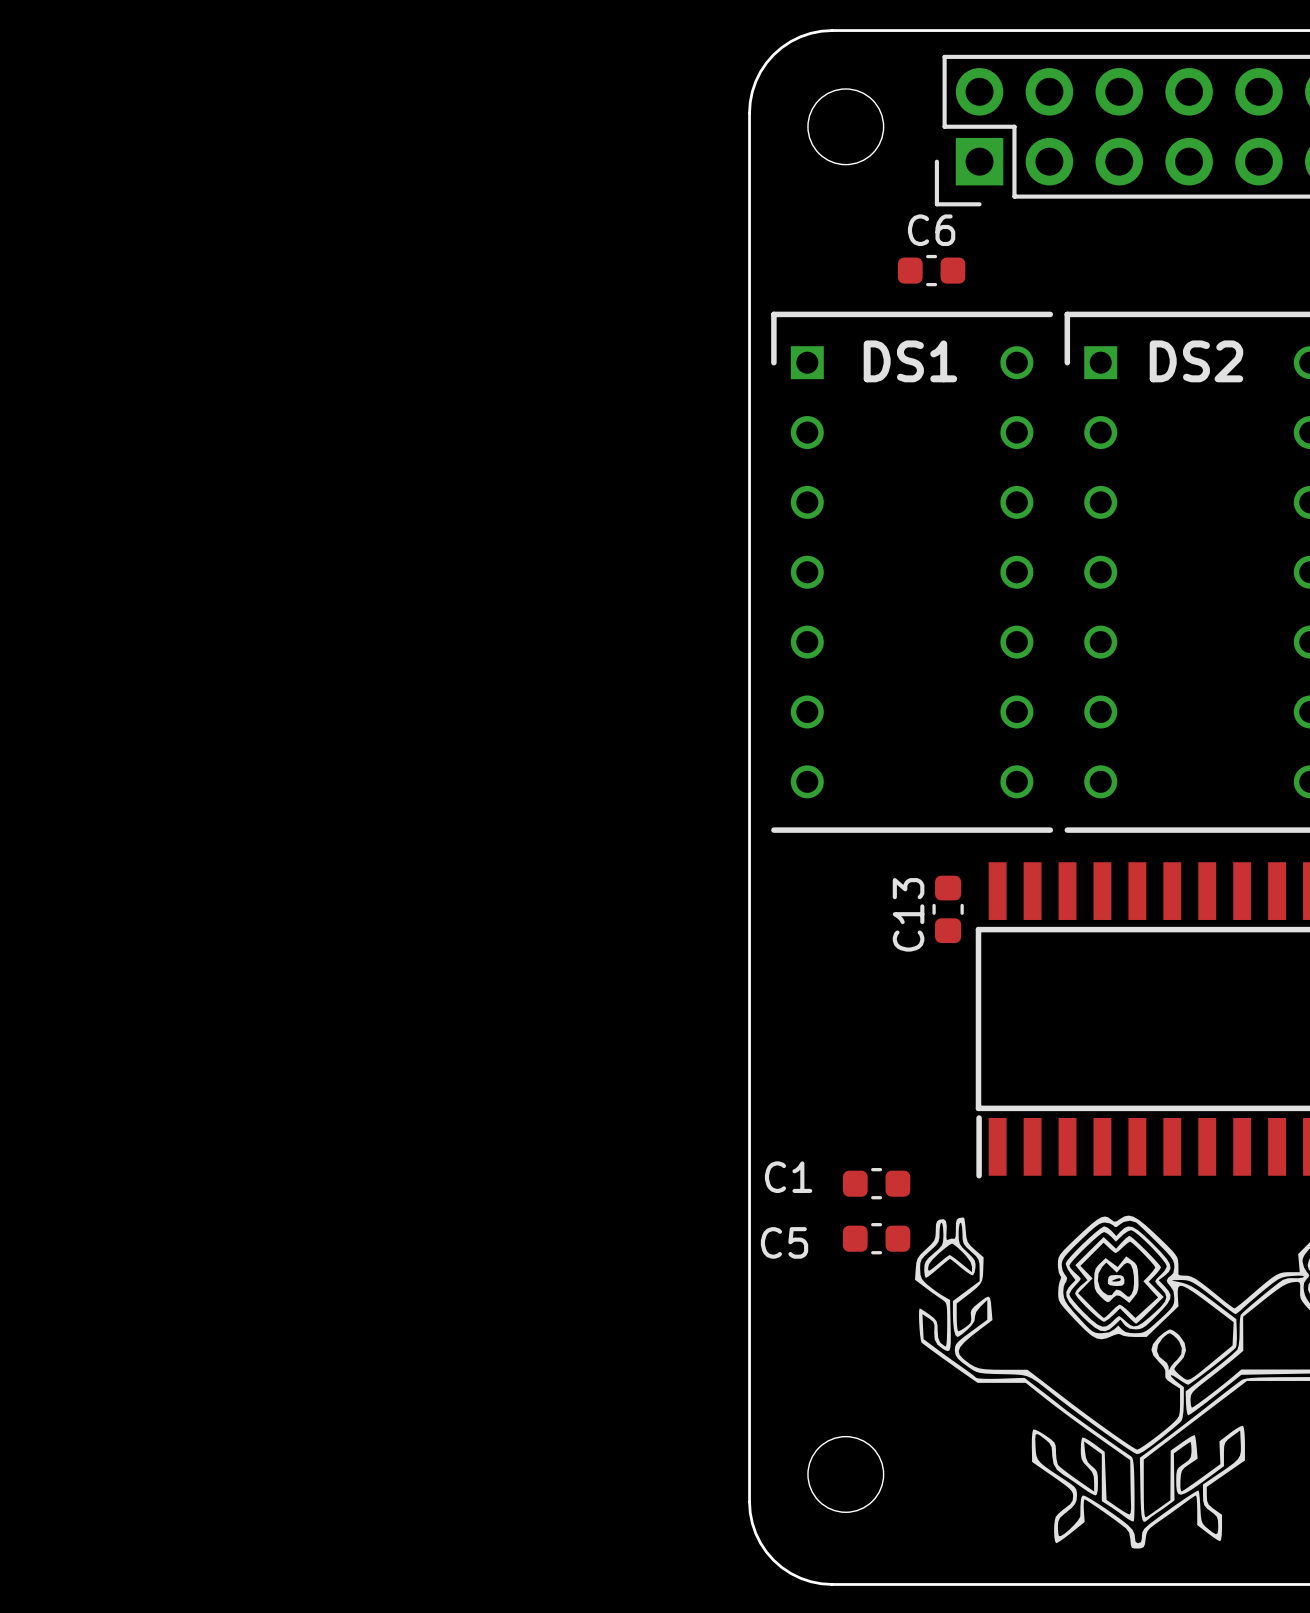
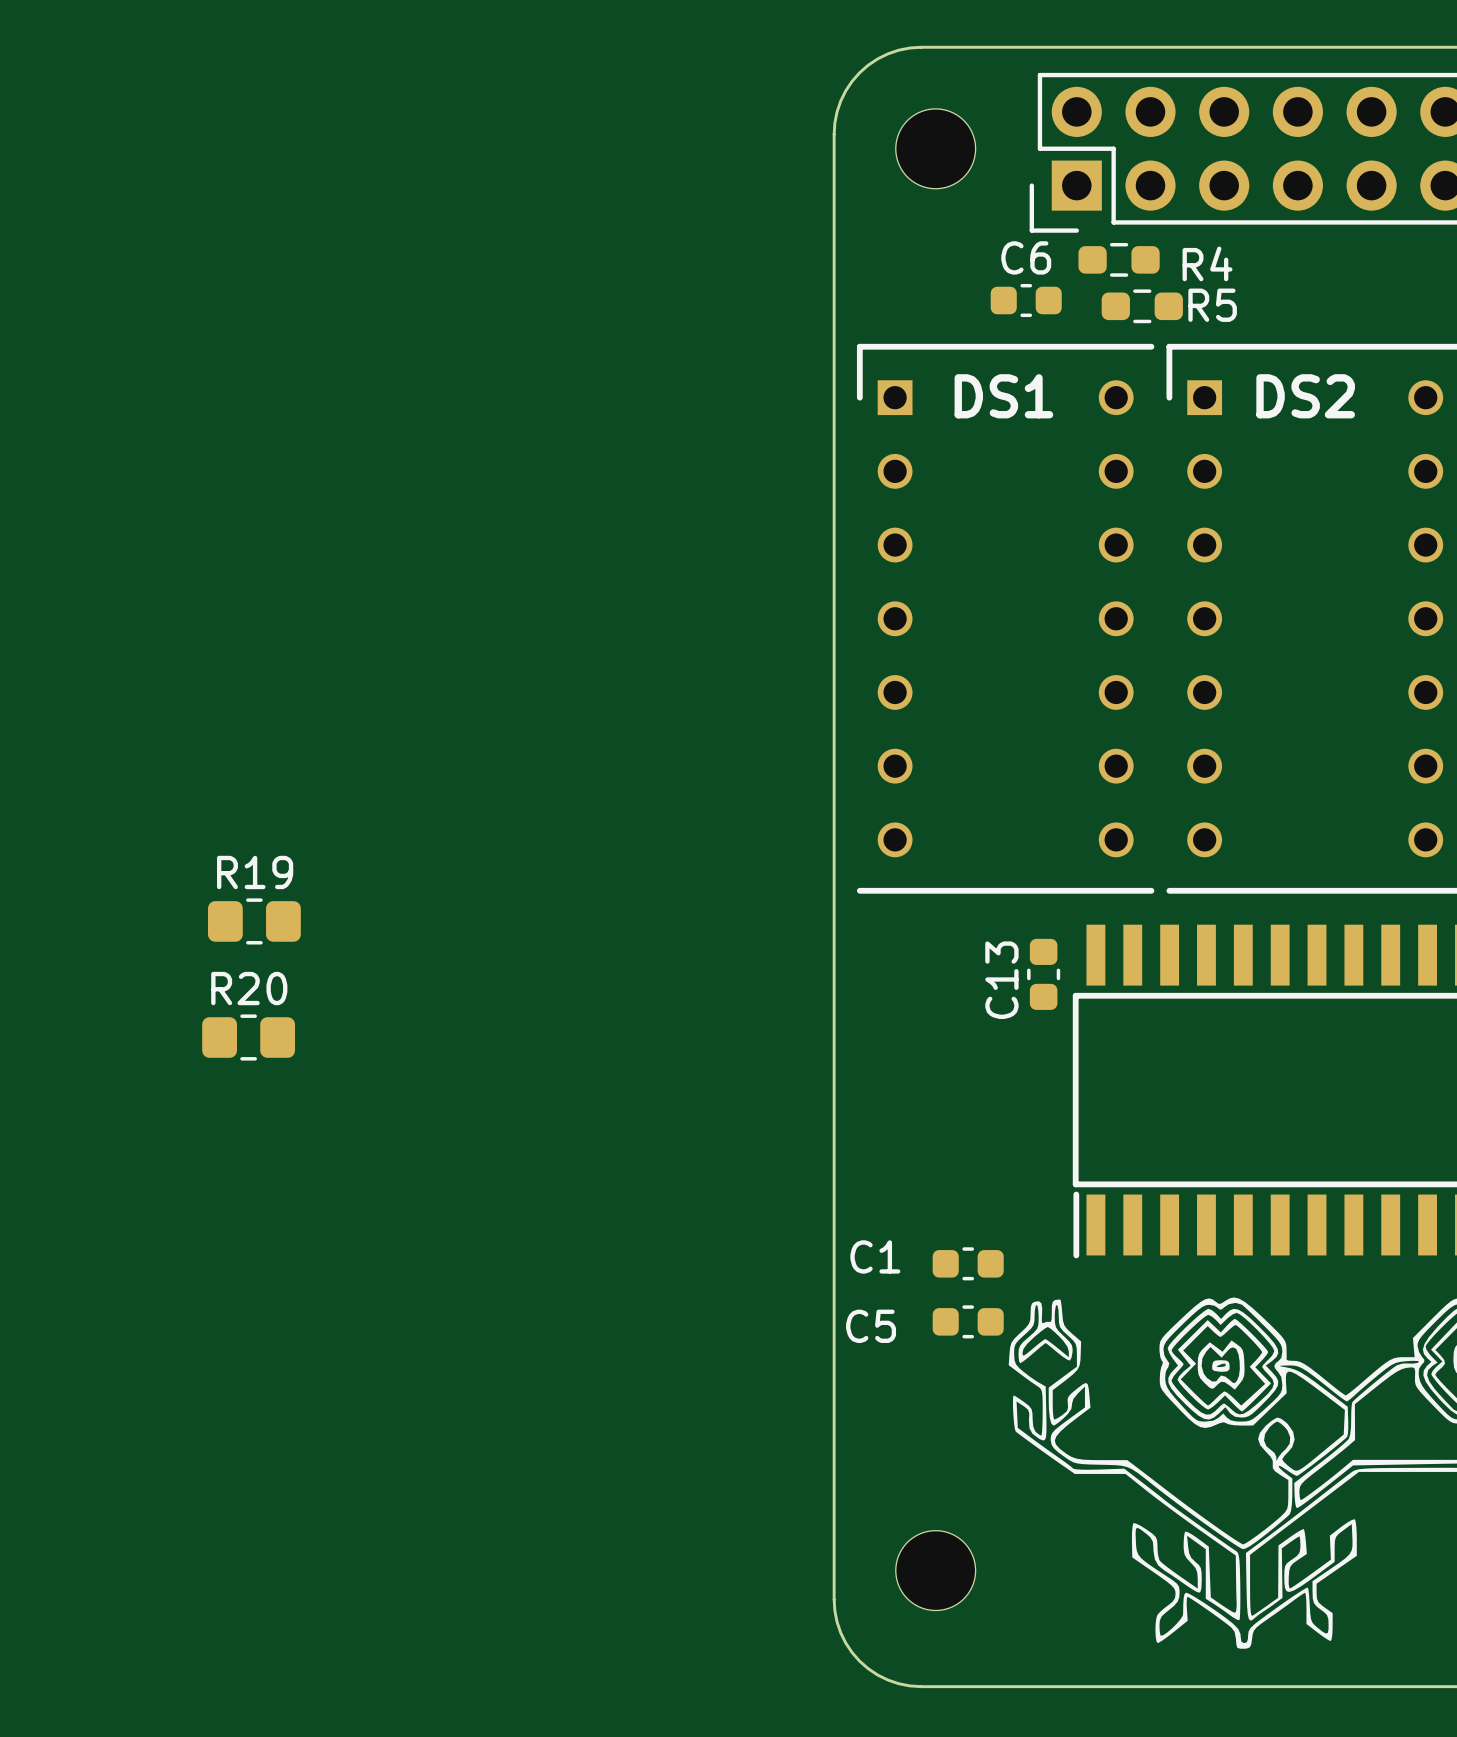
R4: none -> (1119, 259)
R5: none -> (1142, 306)
R19: none -> (254, 921)
R20: none -> (248, 1037)

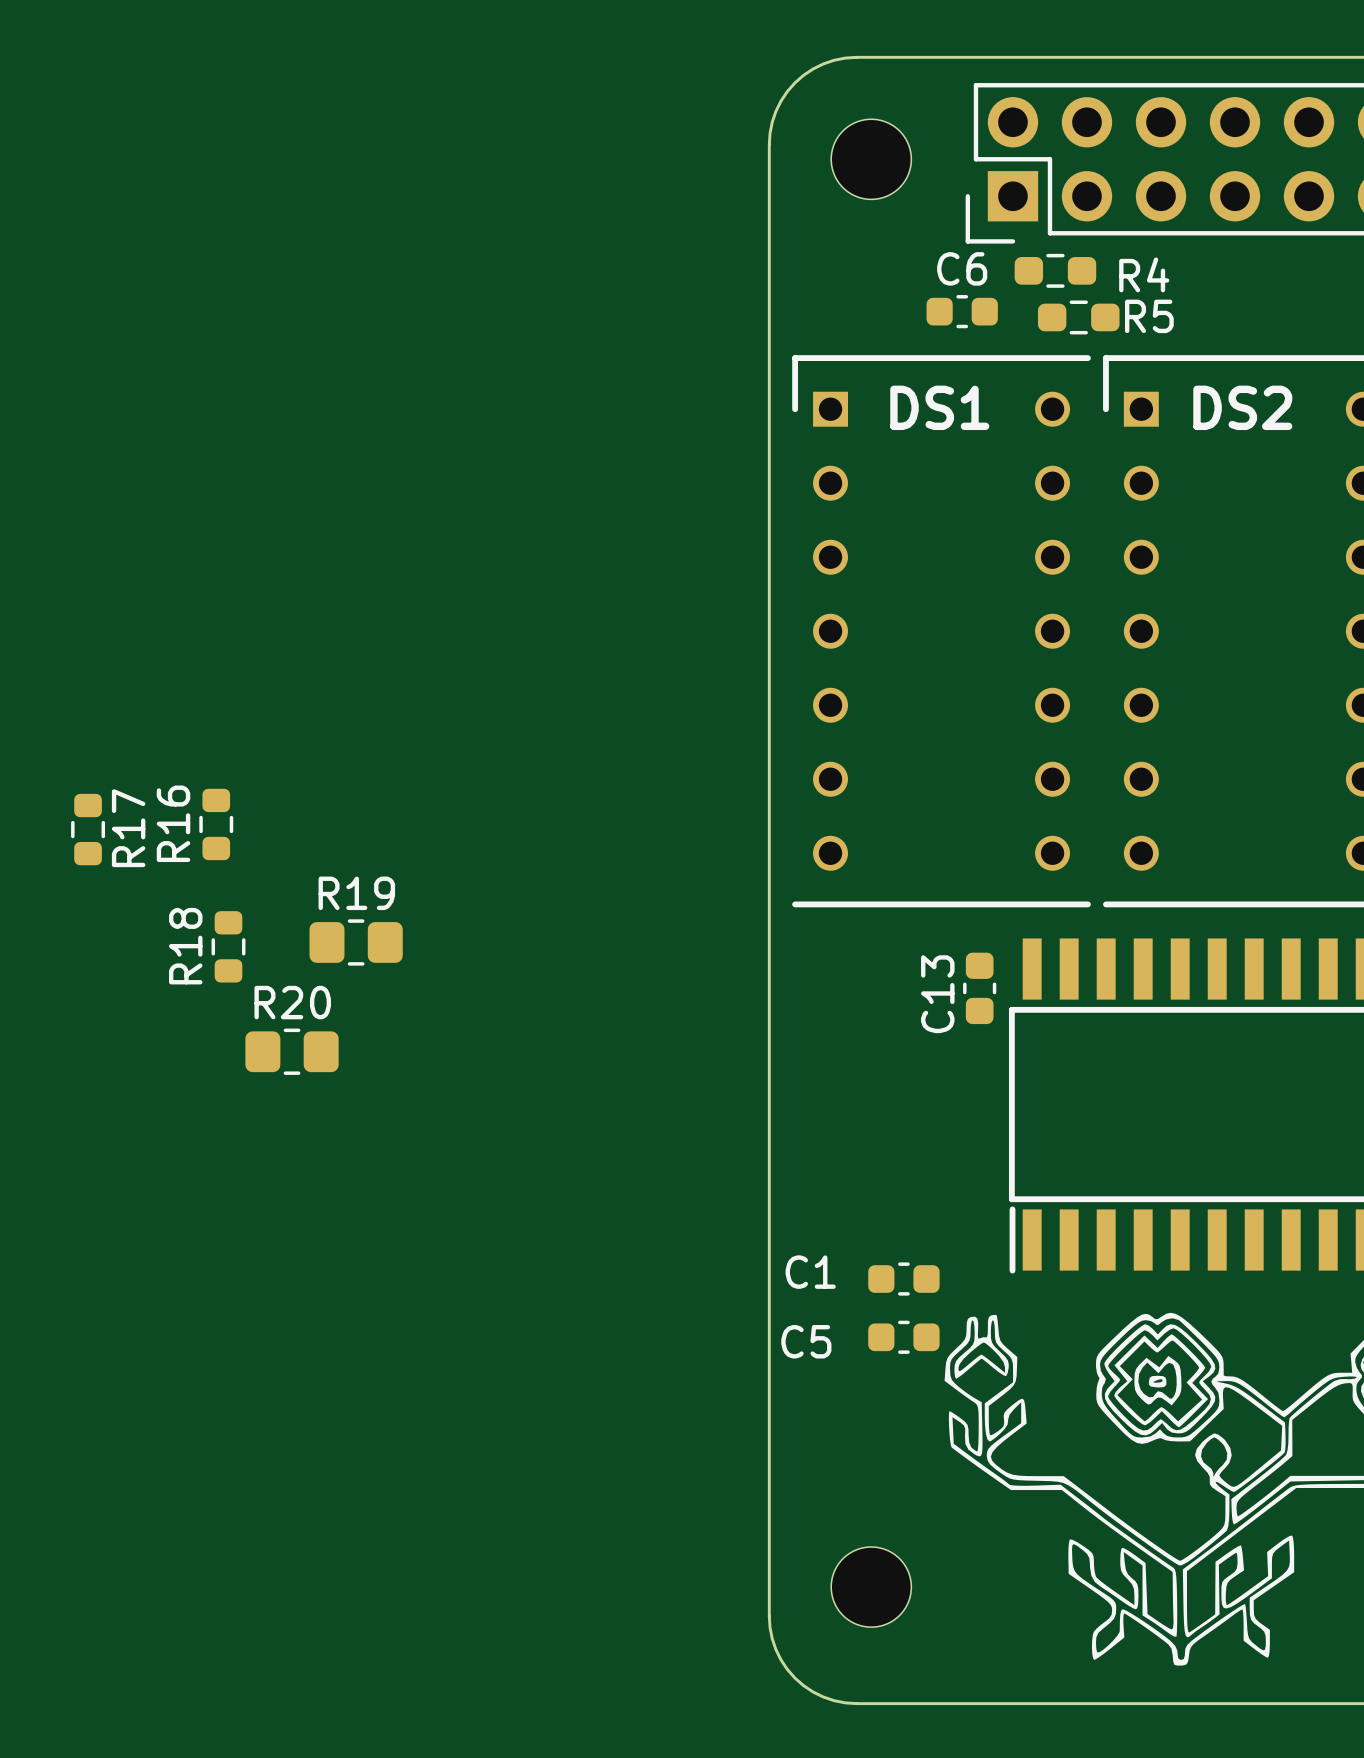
R16: none -> (216, 824)
R17: none -> (88, 829)
R19 position: (254, 921) -> (356, 942)
R18: none -> (228, 946)
R20 position: (248, 1037) -> (292, 1051)

